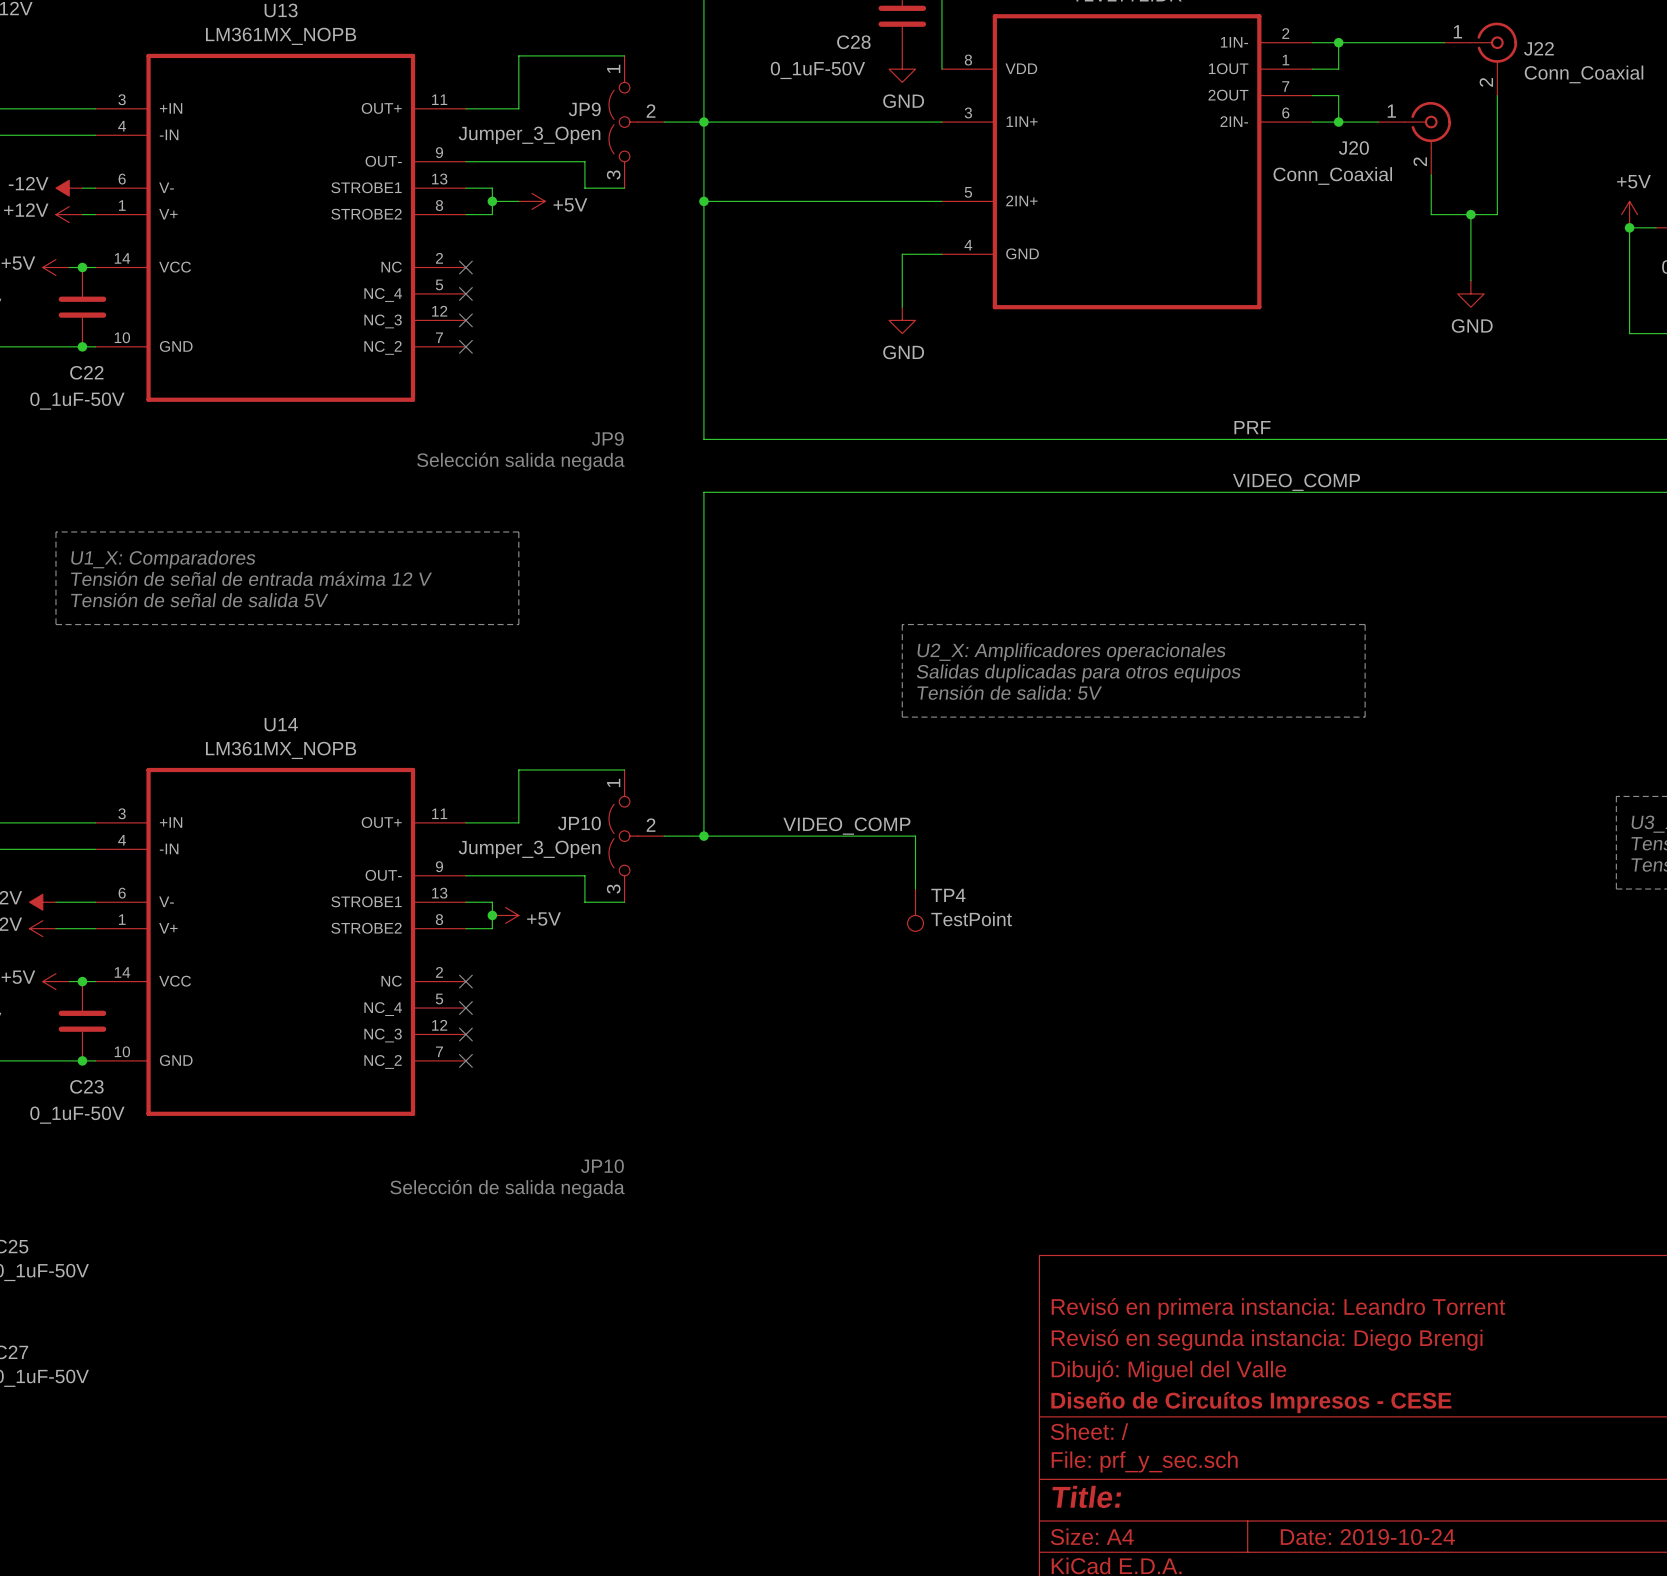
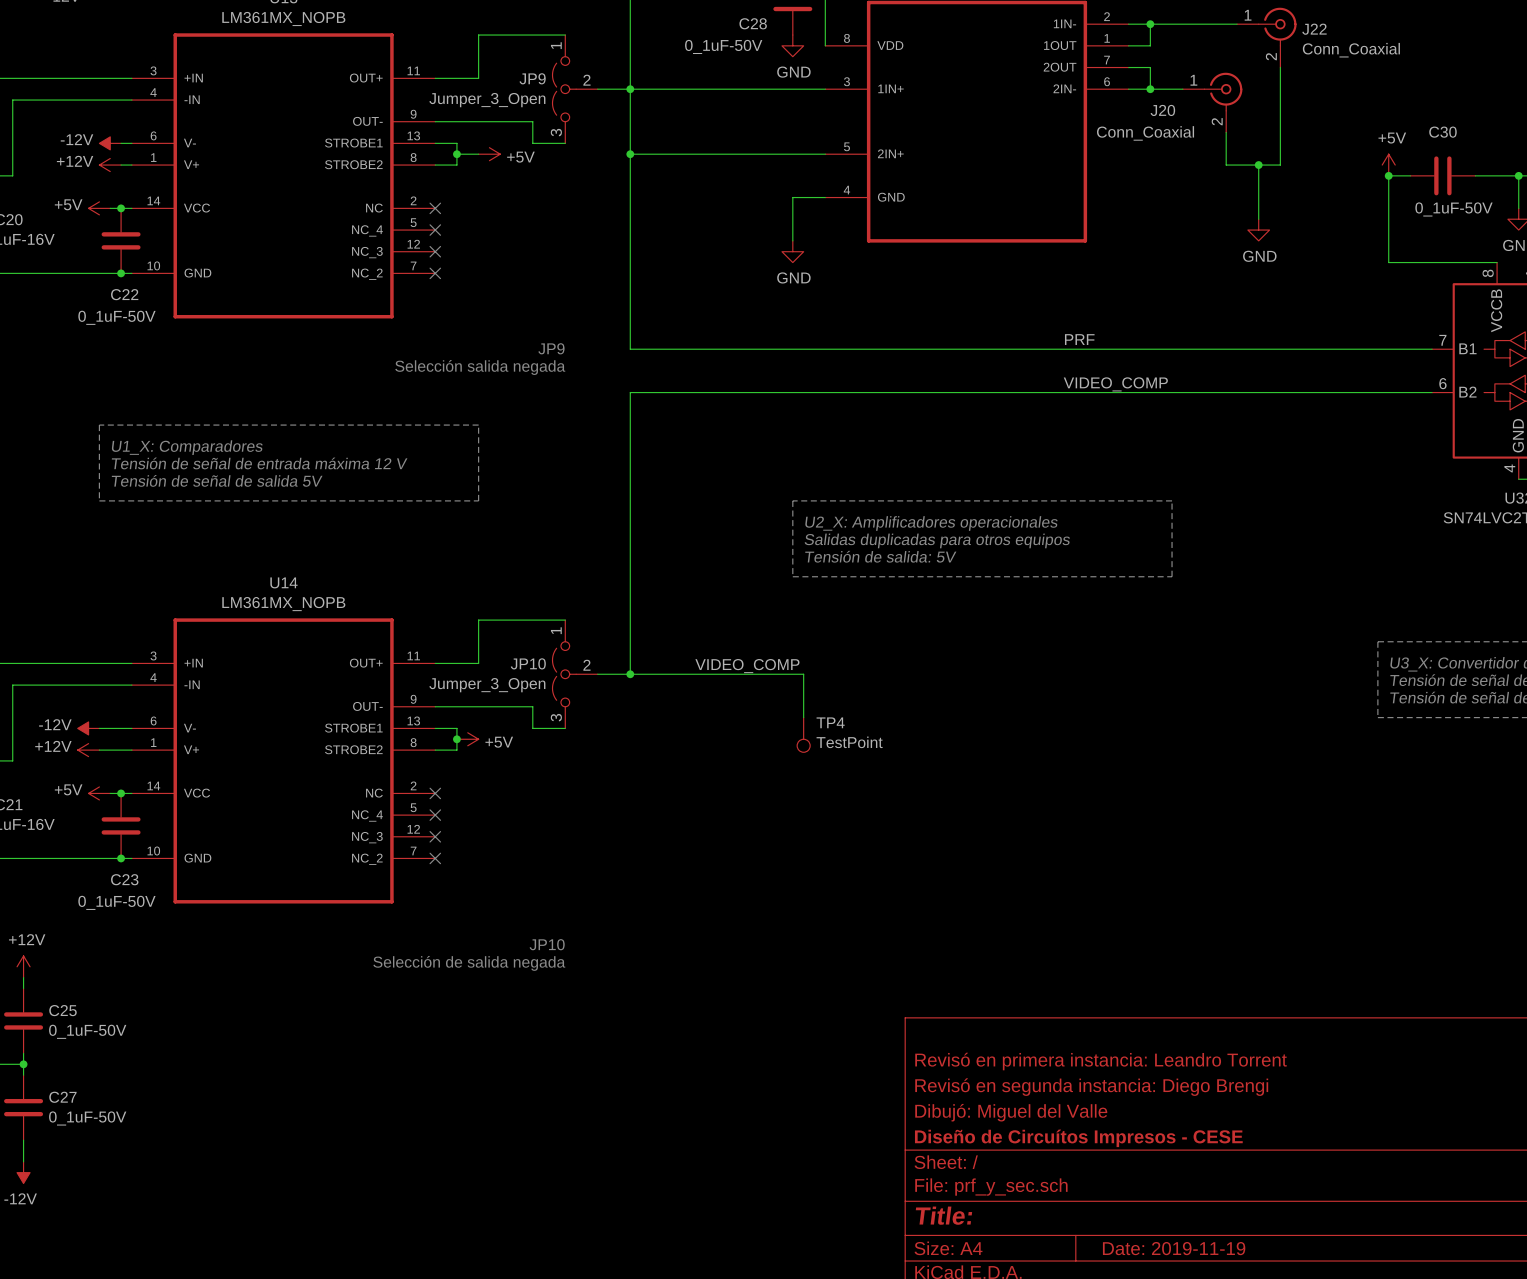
title block: Date: 2019-10-24 (1367, 1537) -> Date: 2019-11-19 (1174, 1248)

